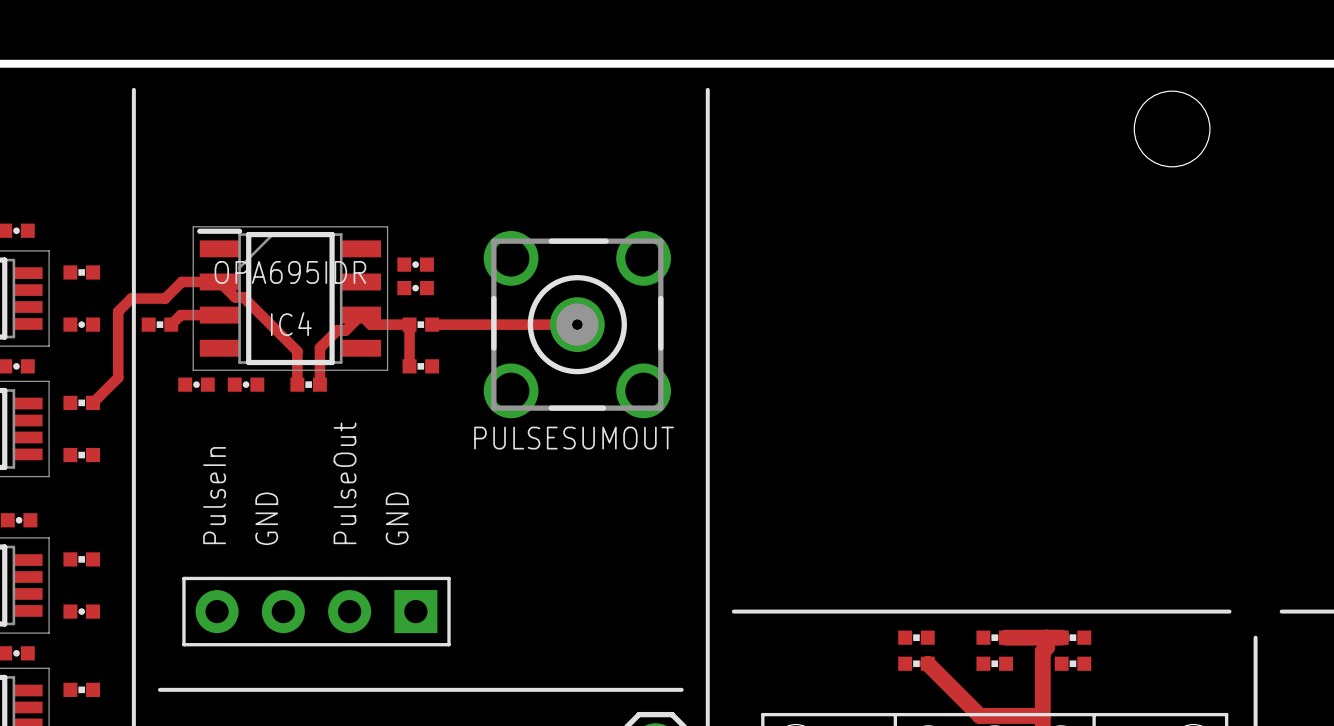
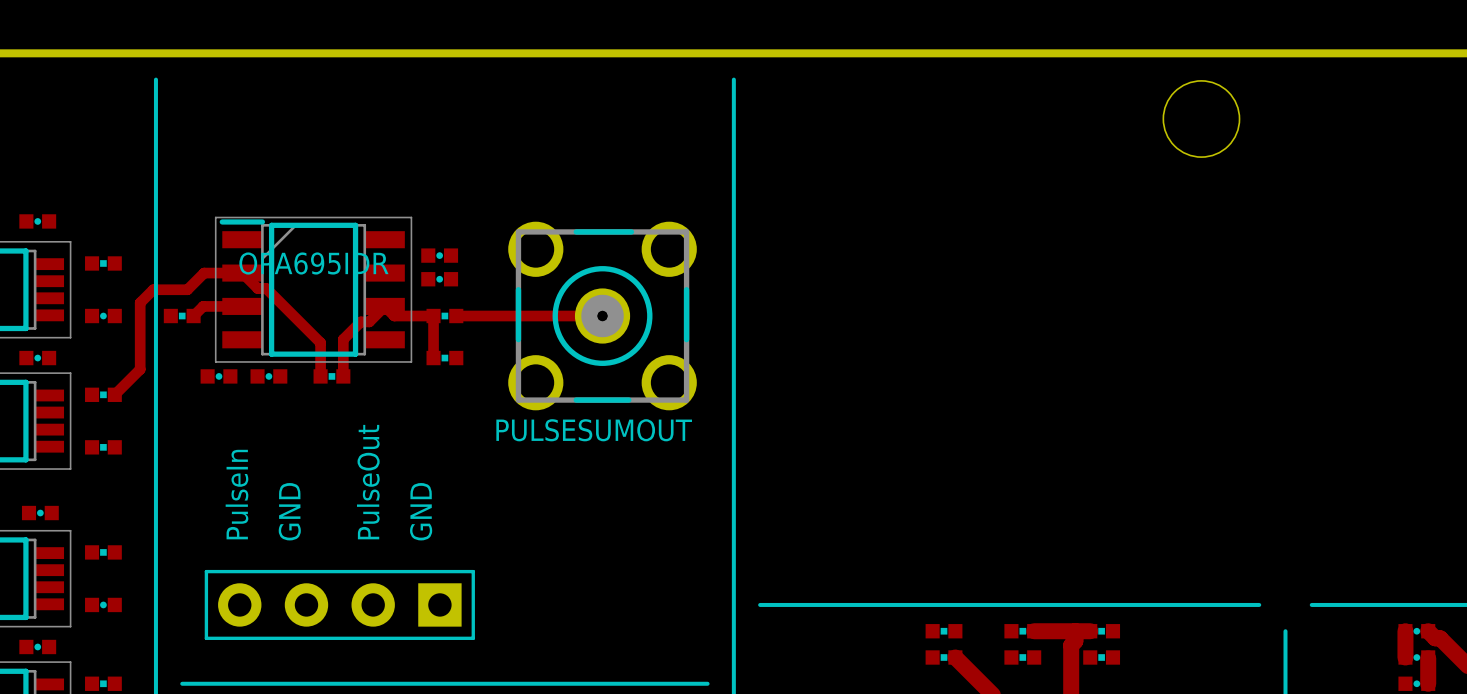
IC4 name: IC4 (291, 324) -> none

